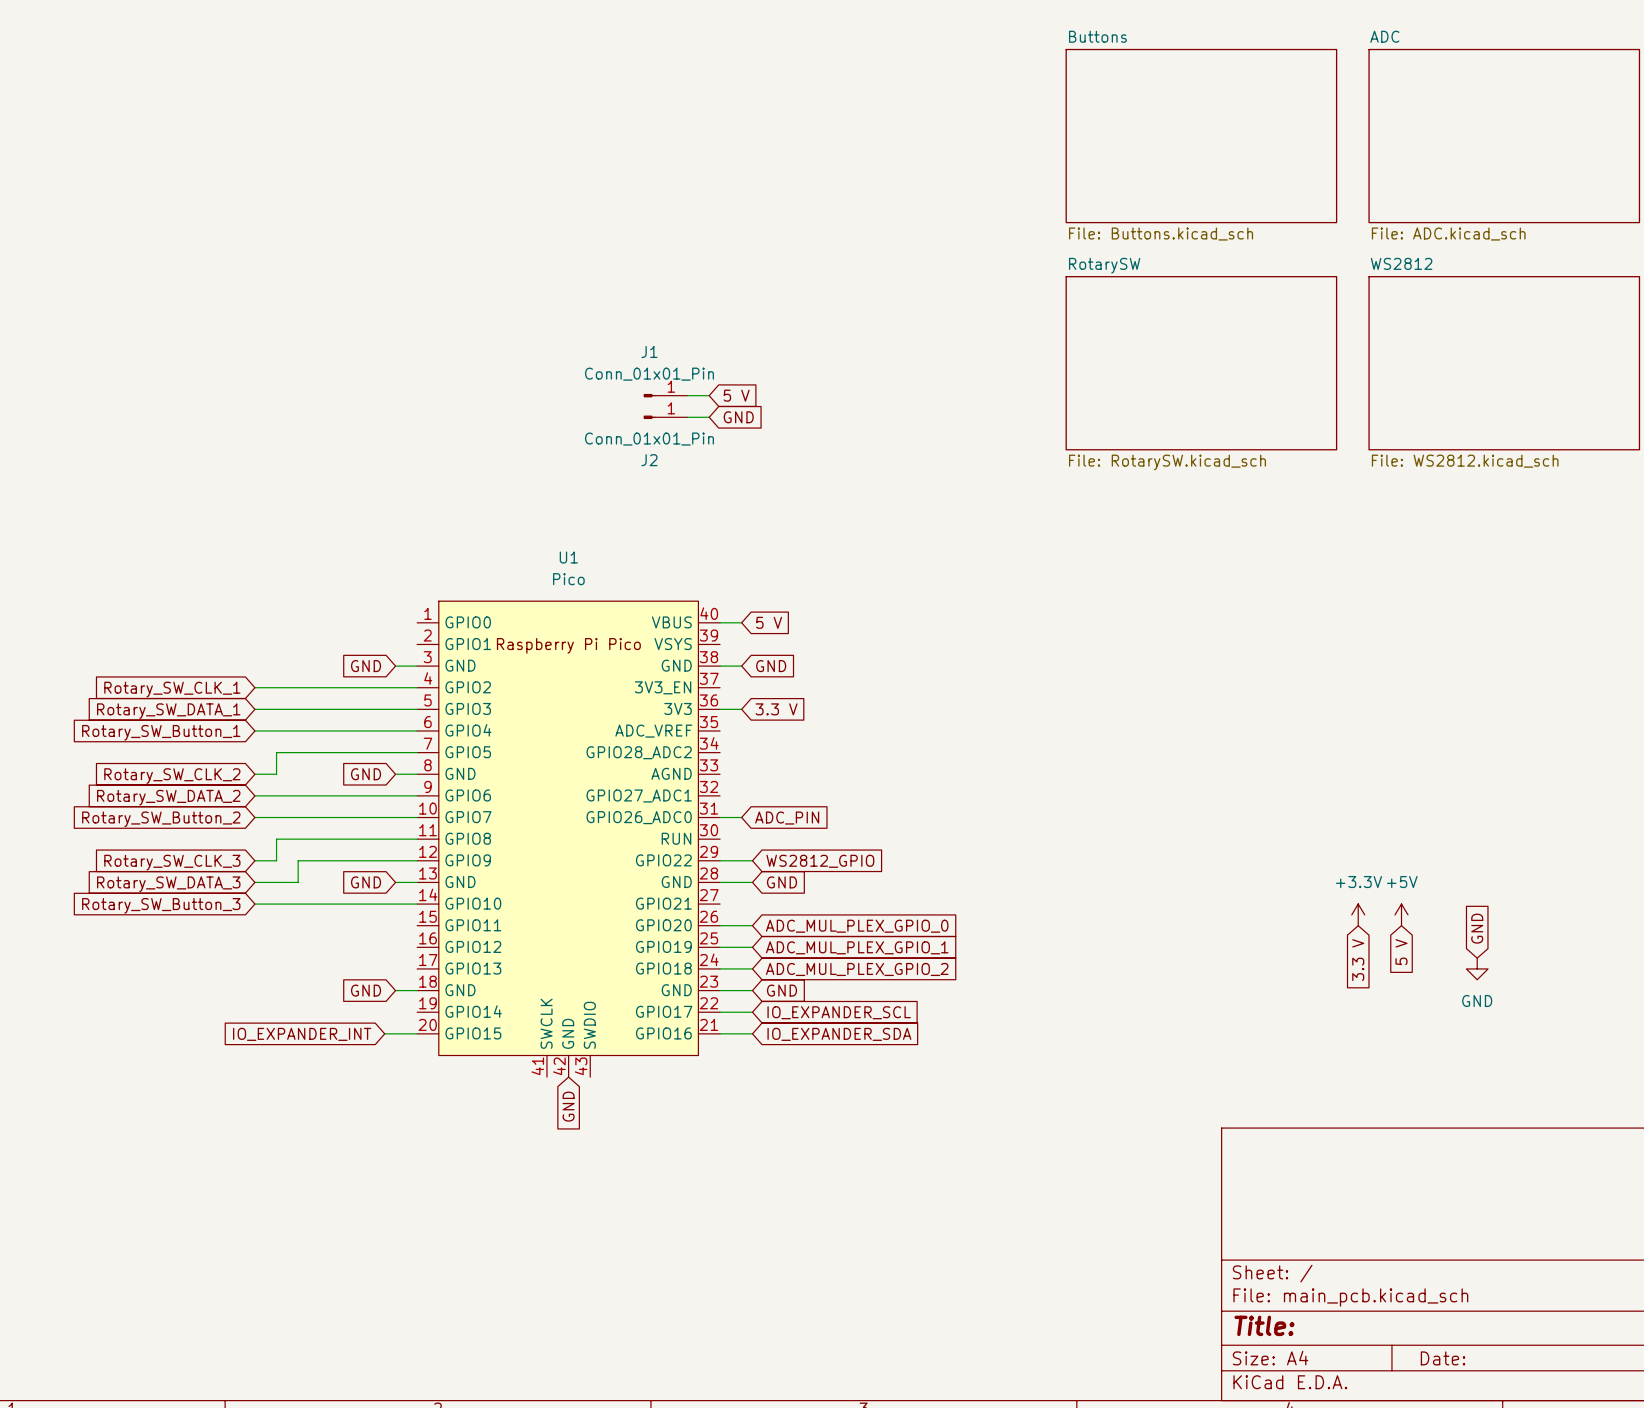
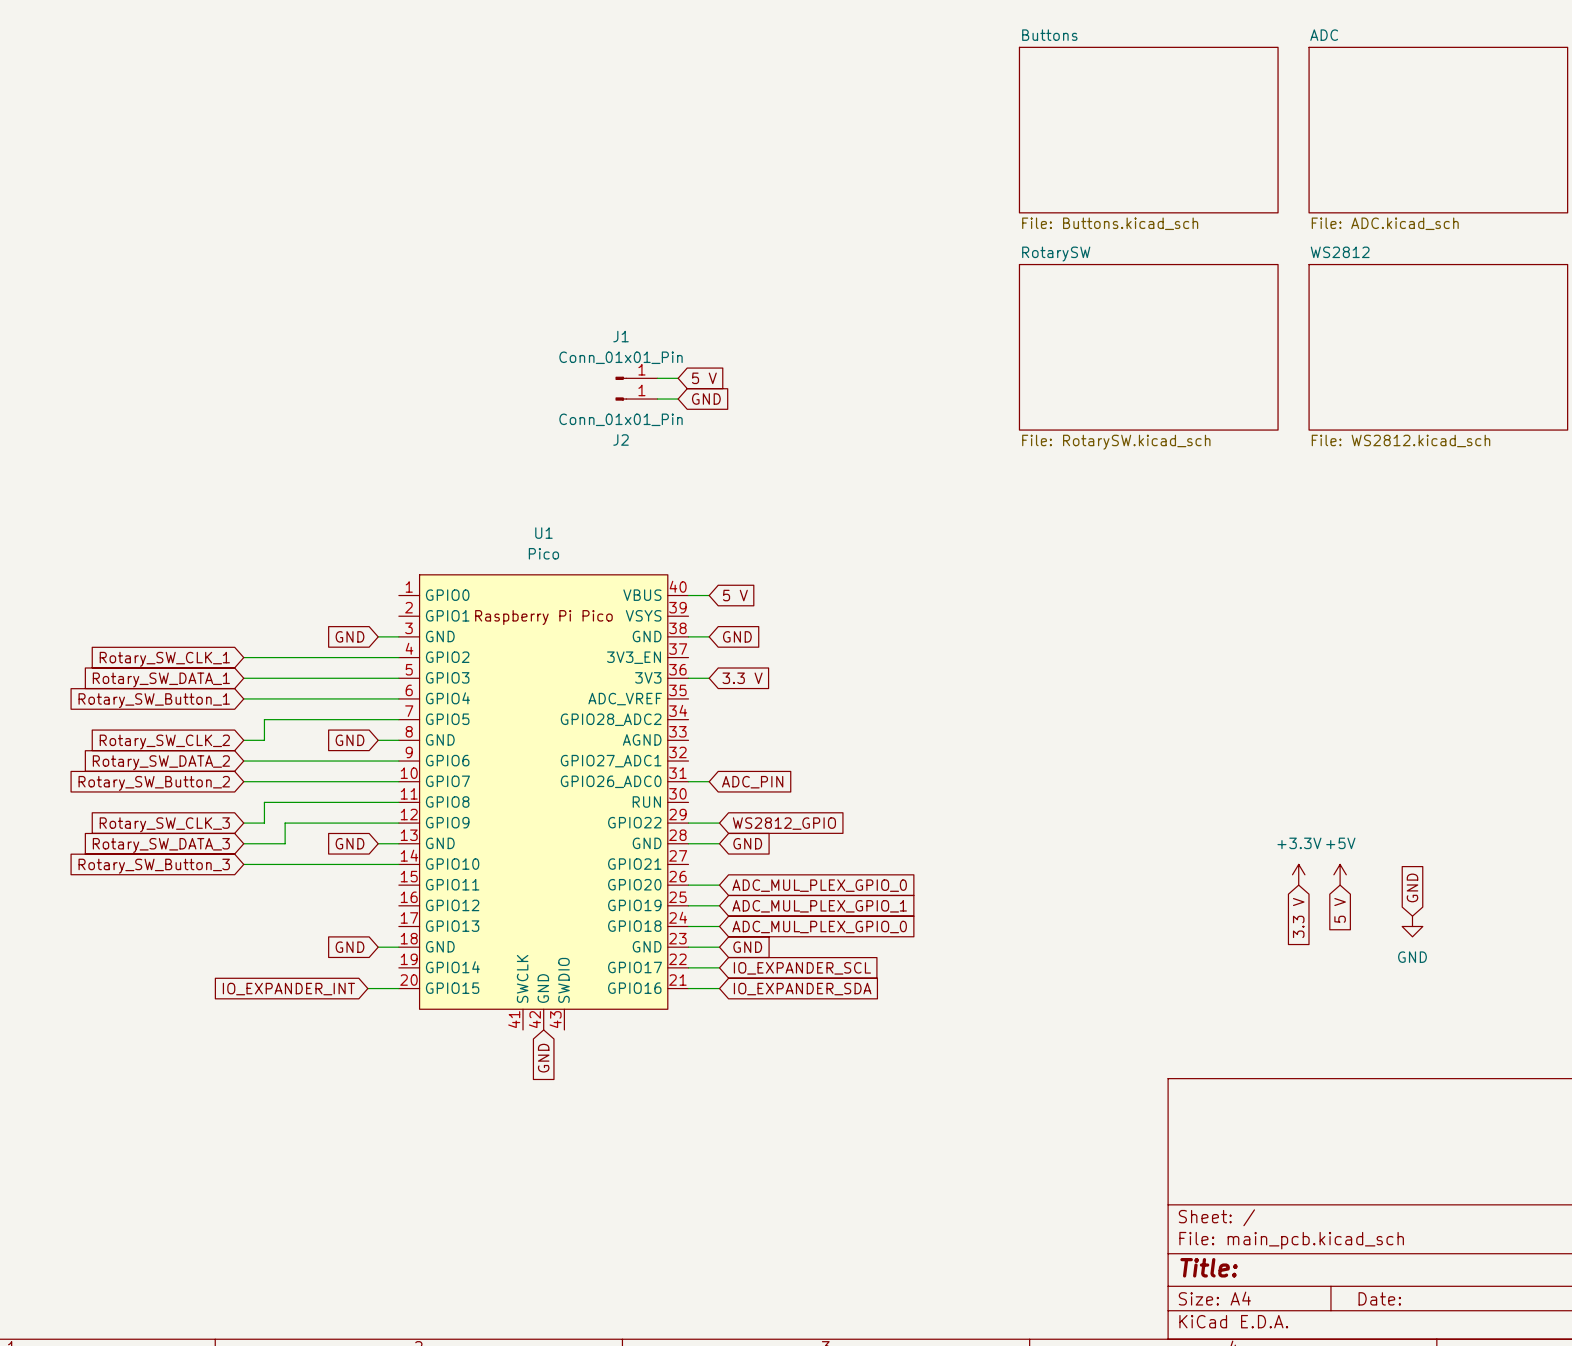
global label: ADC_MUL_PLEX_GPIO_2 (857, 969) -> ADC_MUL_PLEX_GPIO_0 (819, 926)

